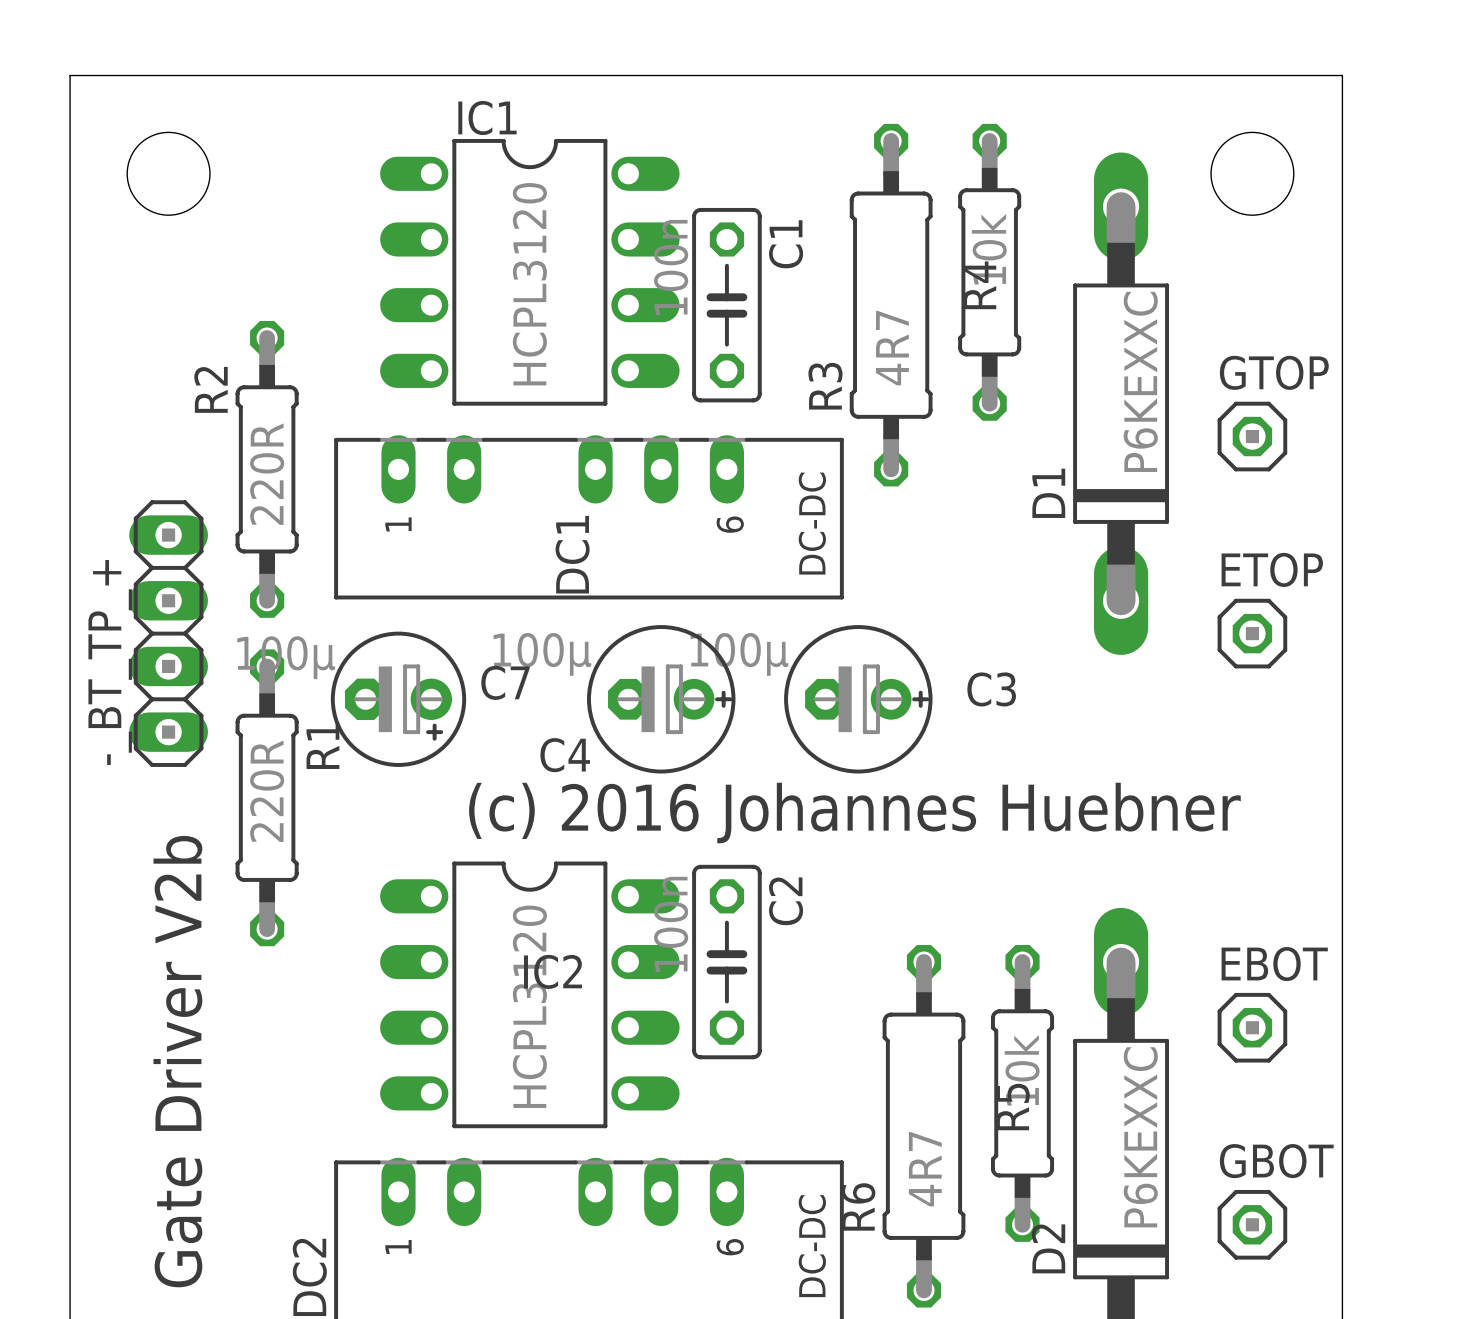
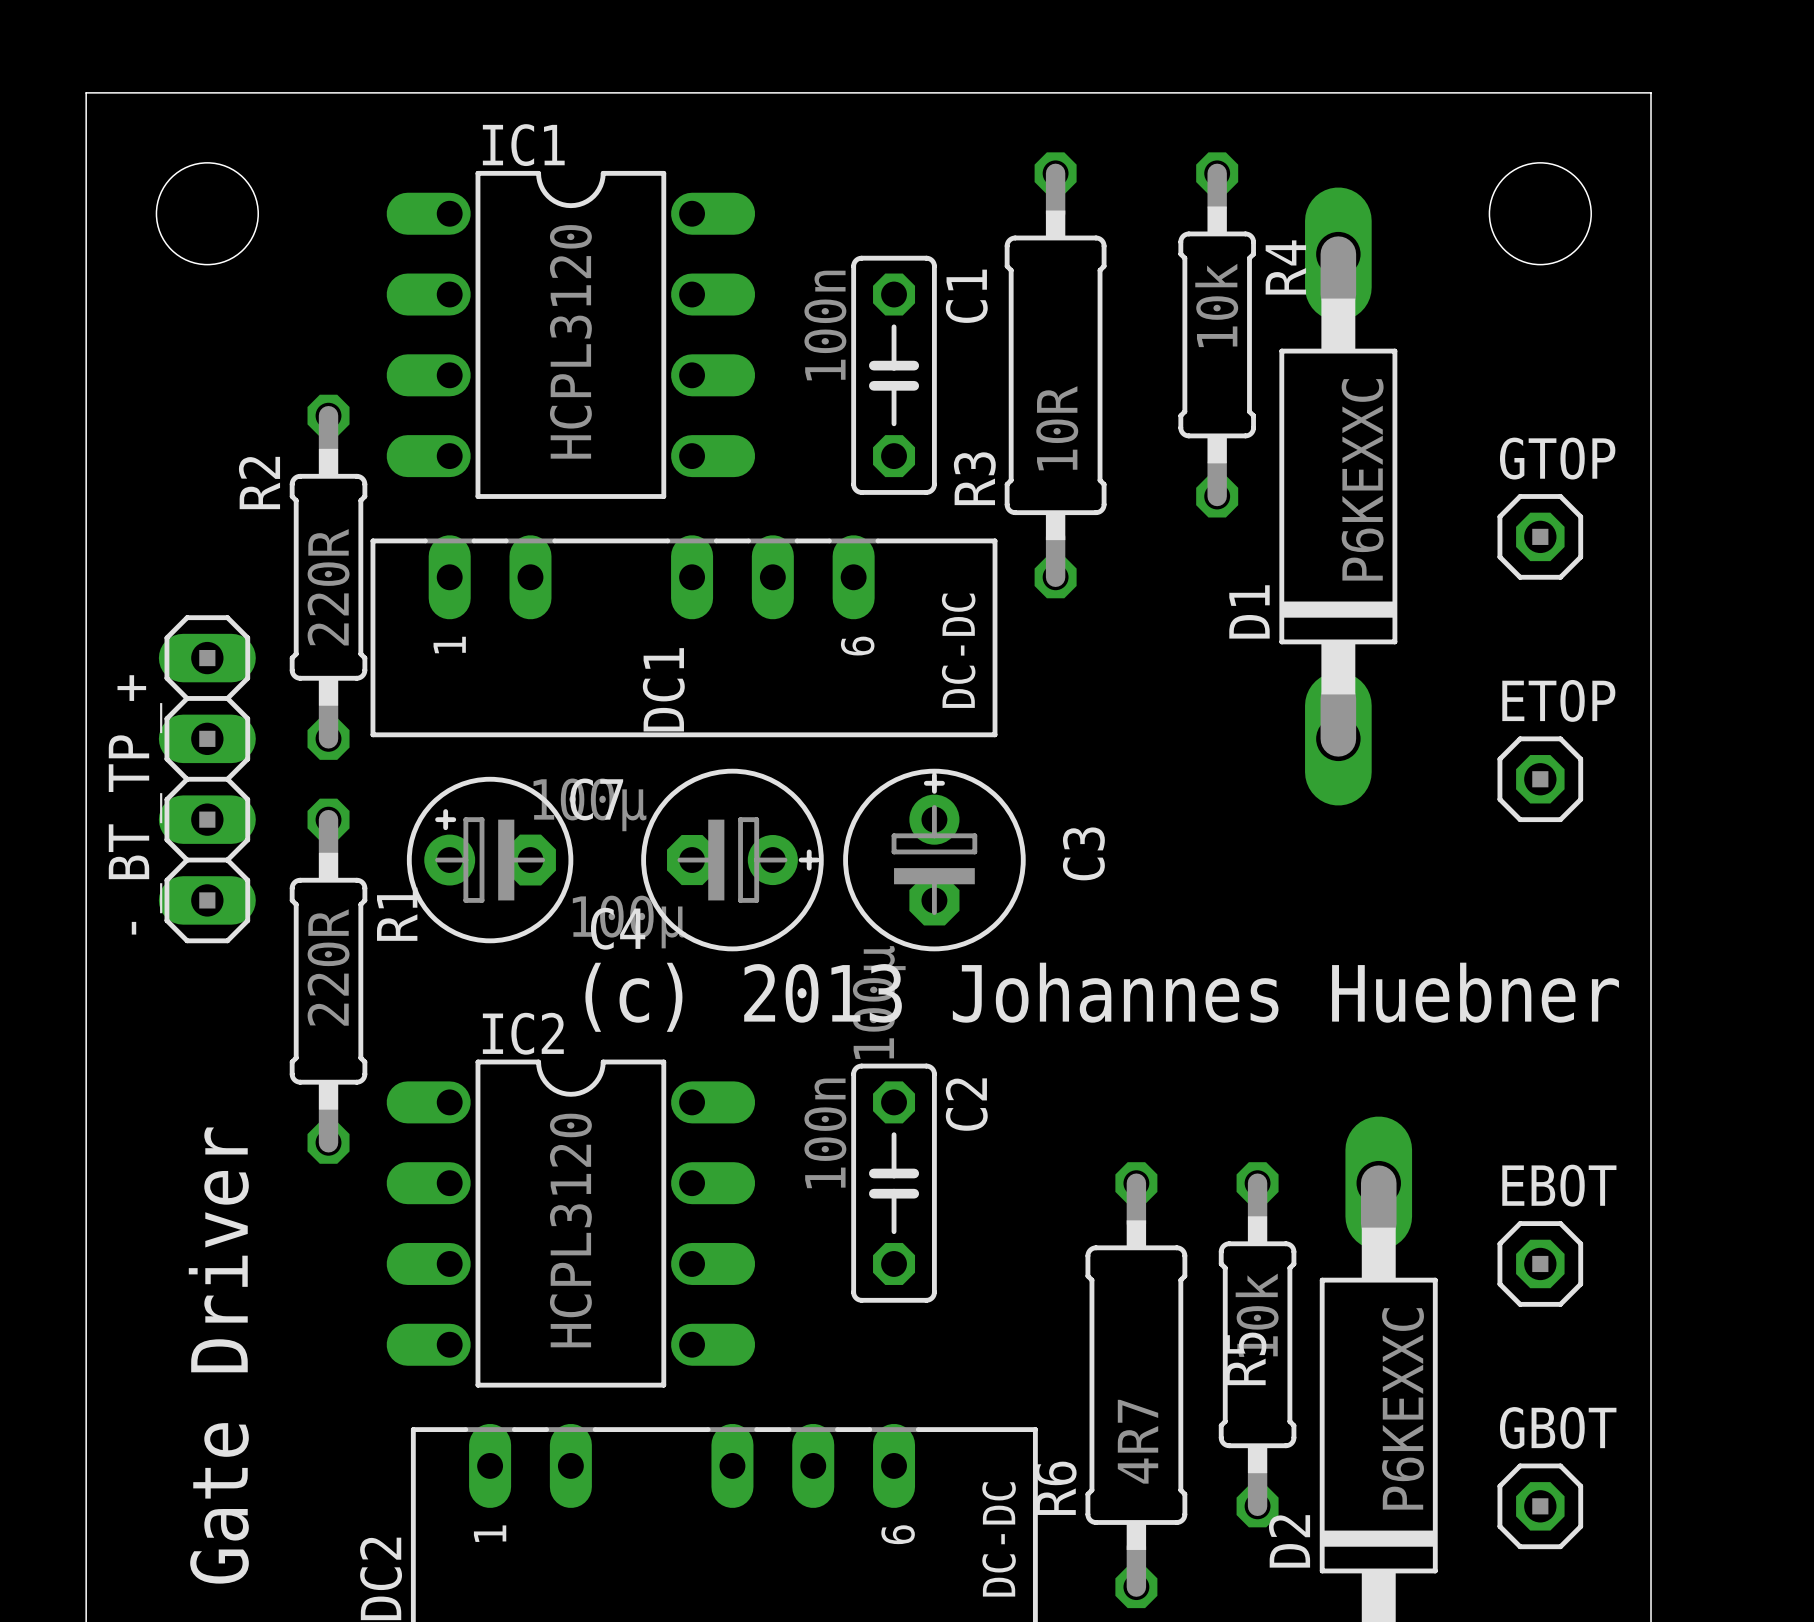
IC1 position: (529, 272) -> (570, 334)
R4 name position: R4 (979, 285) -> R4 (1285, 267)
R3 position: (891, 305) -> (1055, 375)
R3 value: 4R7 (892, 348) -> 10R (1057, 428)
D1 position: (1121, 403) -> (1338, 496)
DC1 position: (588, 517) -> (683, 636)
C7 rotation: 0° (398, 699) -> 180° (490, 860)
C4 position: (661, 699) -> (732, 860)
C3 rotation: 0° (858, 699) -> 90° counterclockwise (934, 860)
C3 position: (858, 699) -> (934, 860)
text: (c) 2016 Johannes Huebner (854, 813) -> (c) 2013 Johannes Huebner (1102, 997)
IC2 name position: IC2 (553, 971) -> IC2 (523, 1033)
IC2 position: (529, 994) -> (570, 1223)
text: Gate Driver V2b (177, 1061) -> Gate Driver (218, 1355)

